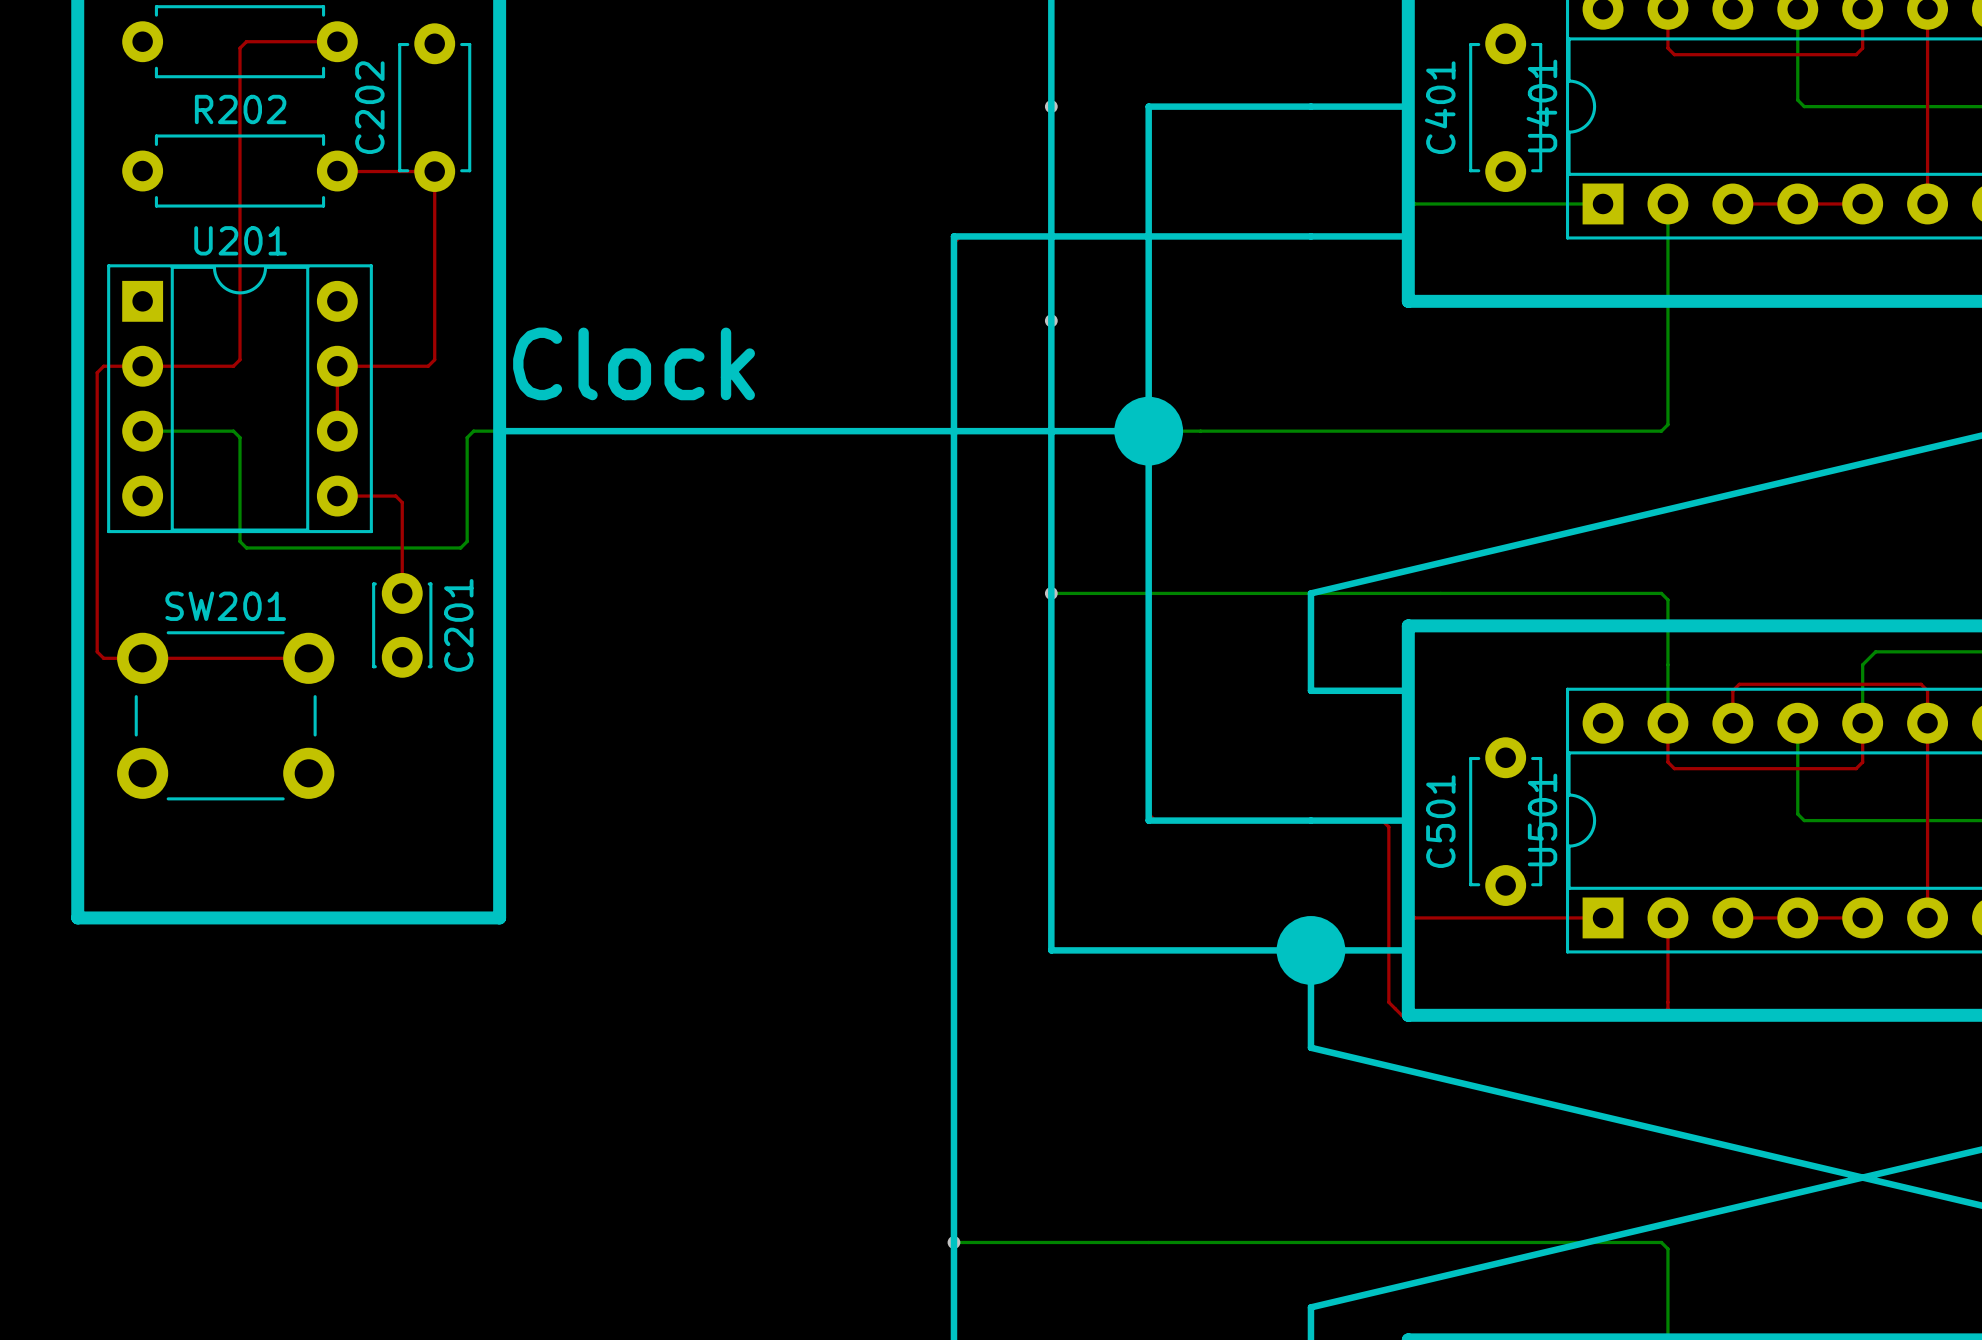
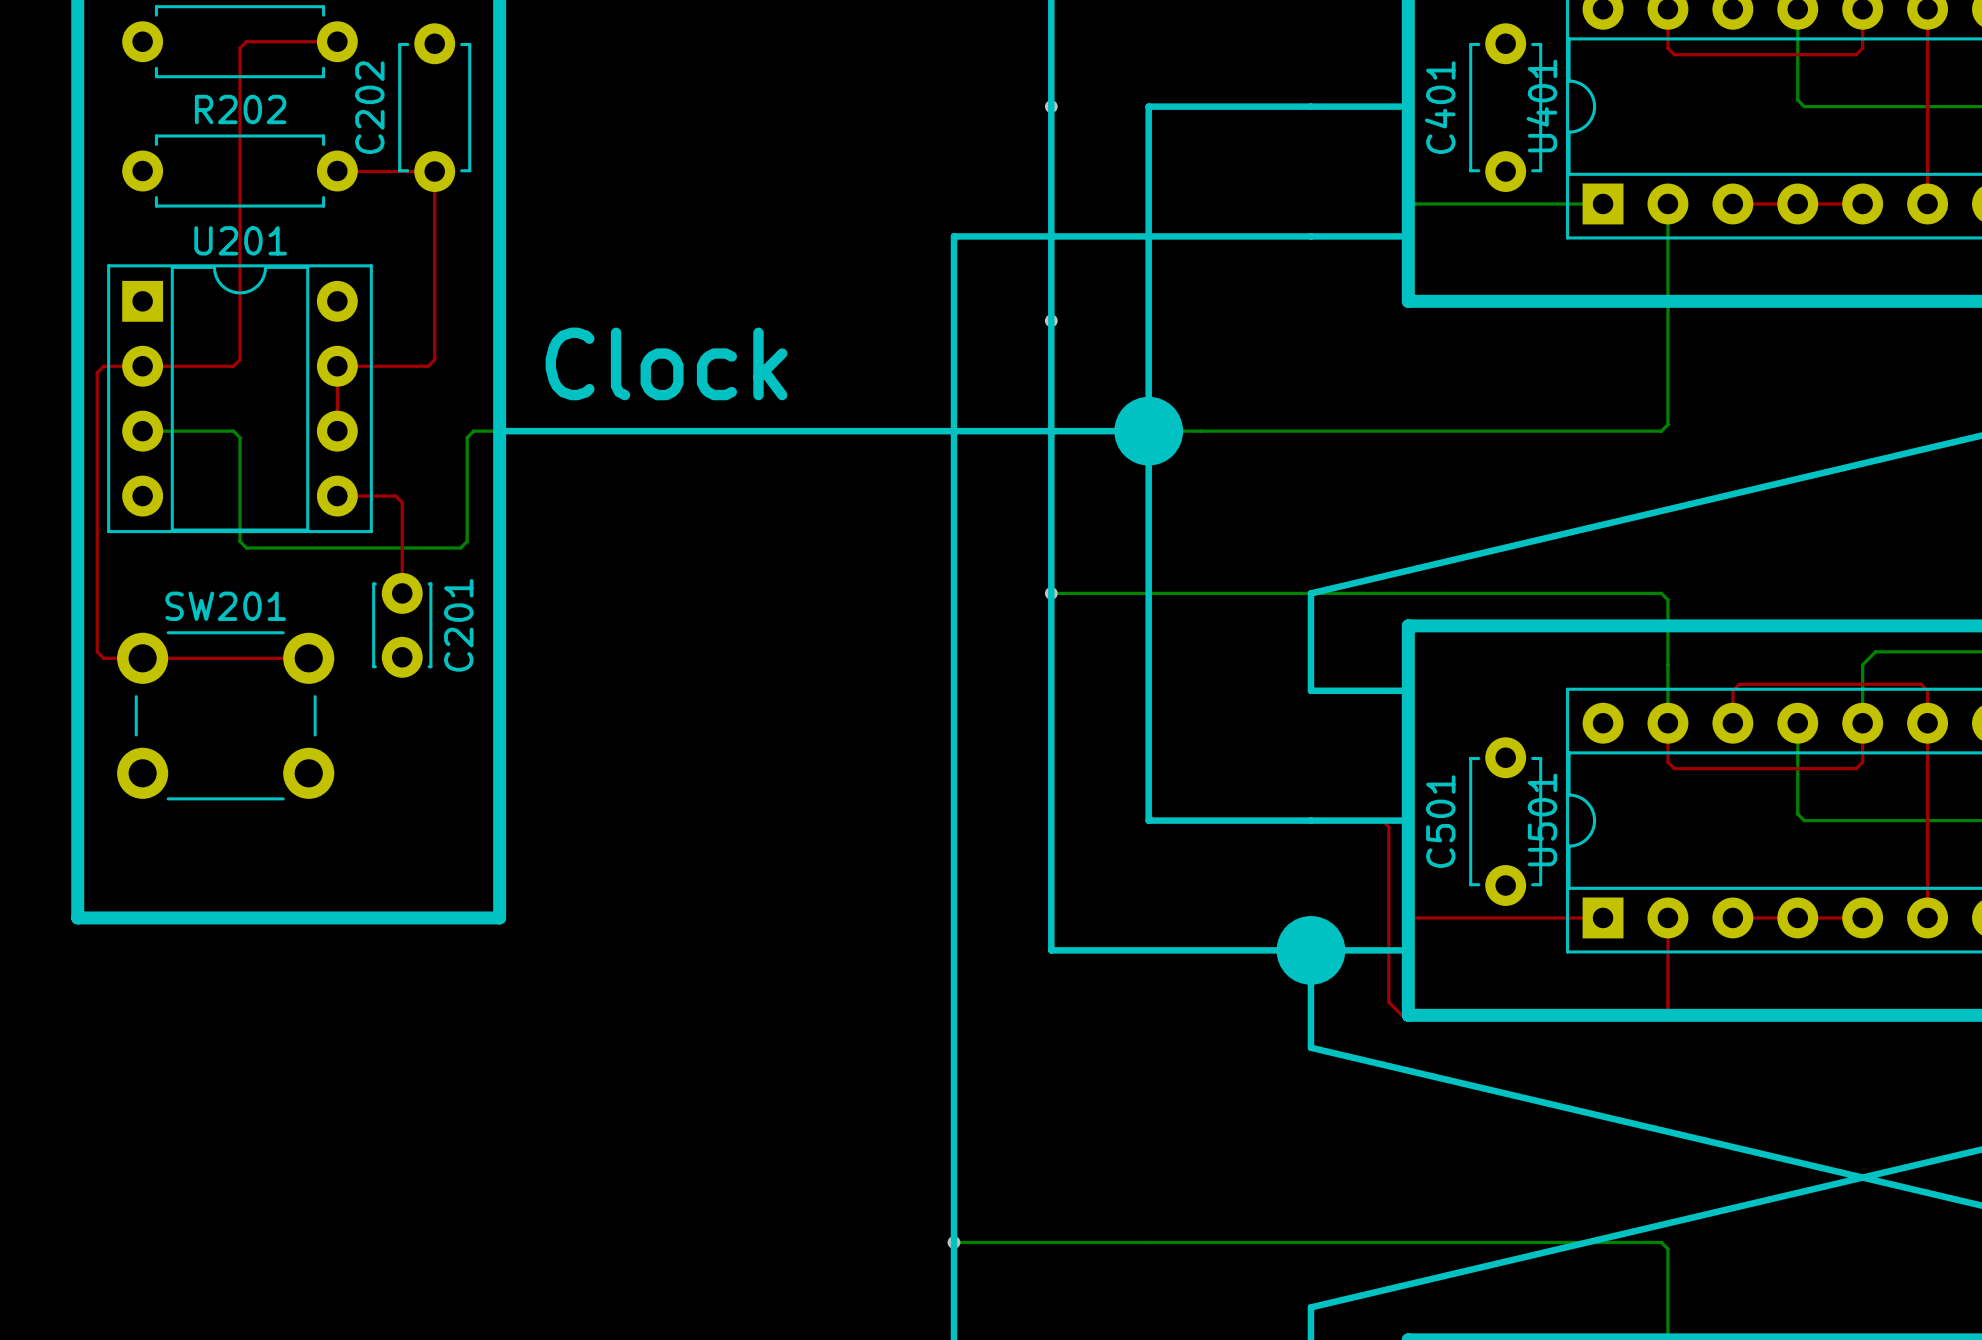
text position: Clock (634, 363) -> Clock (666, 363)

